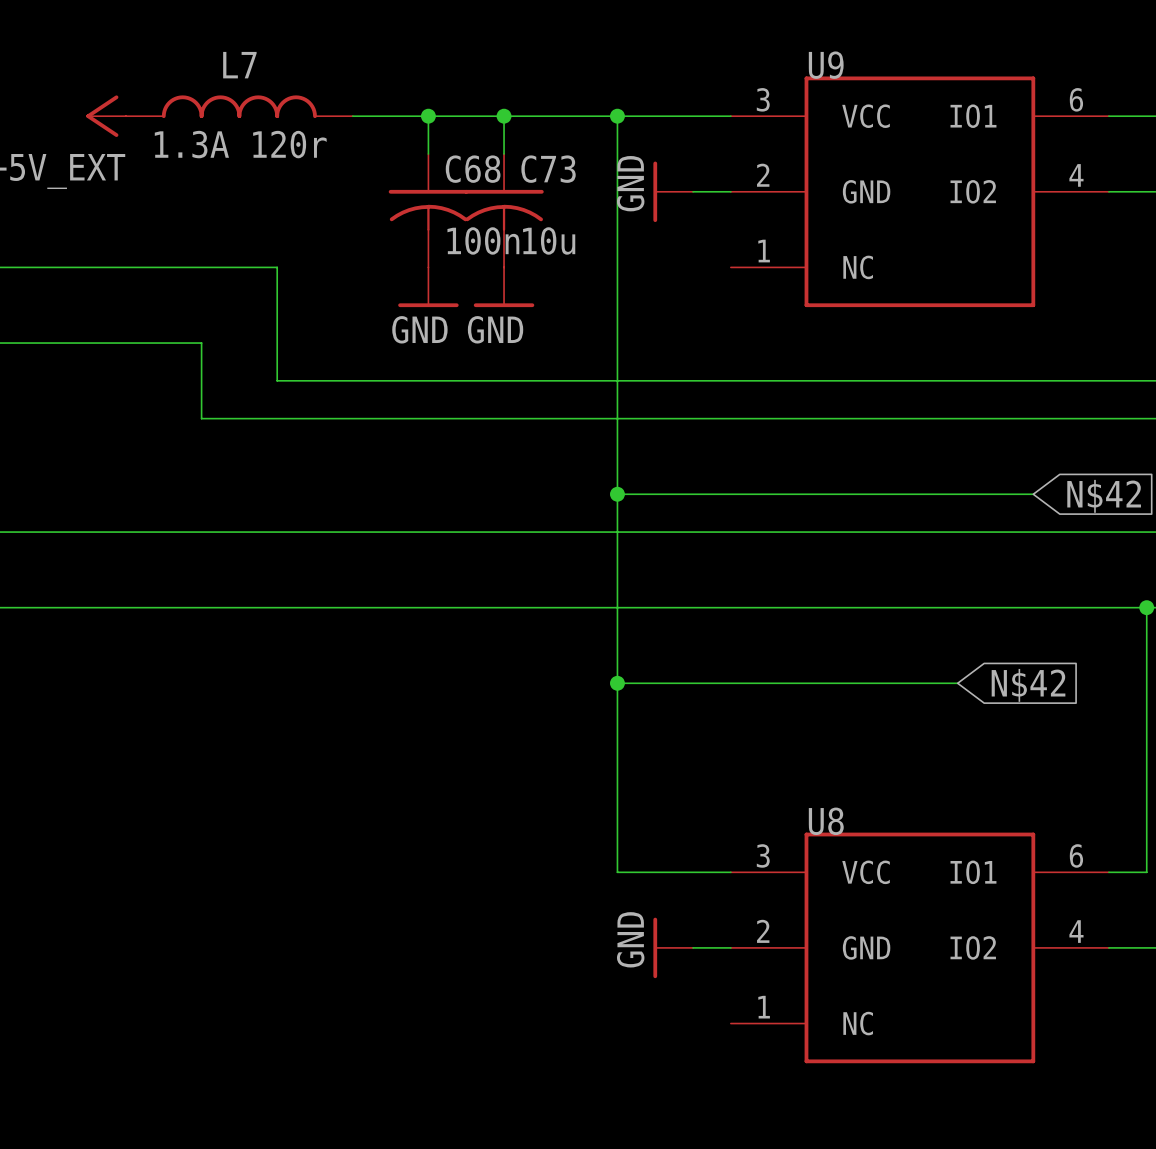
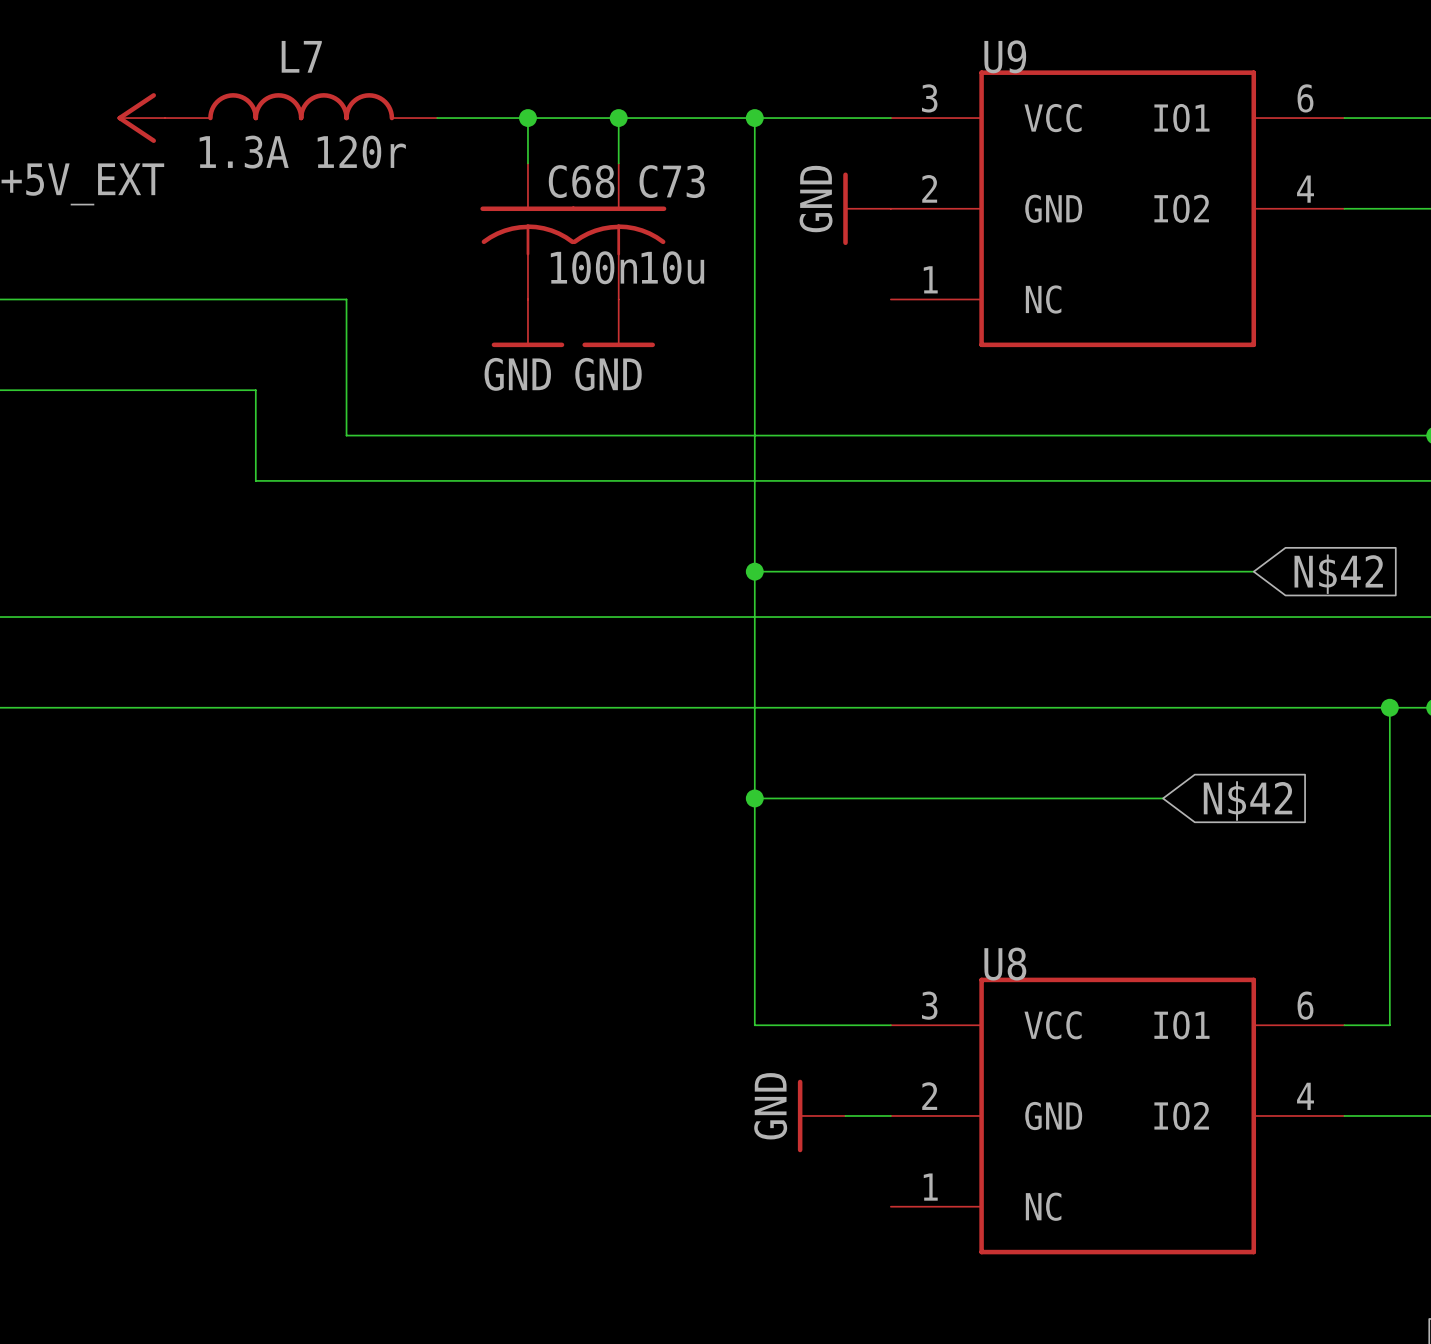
power symbol position: GND (673, 191) -> GND (867, 208)

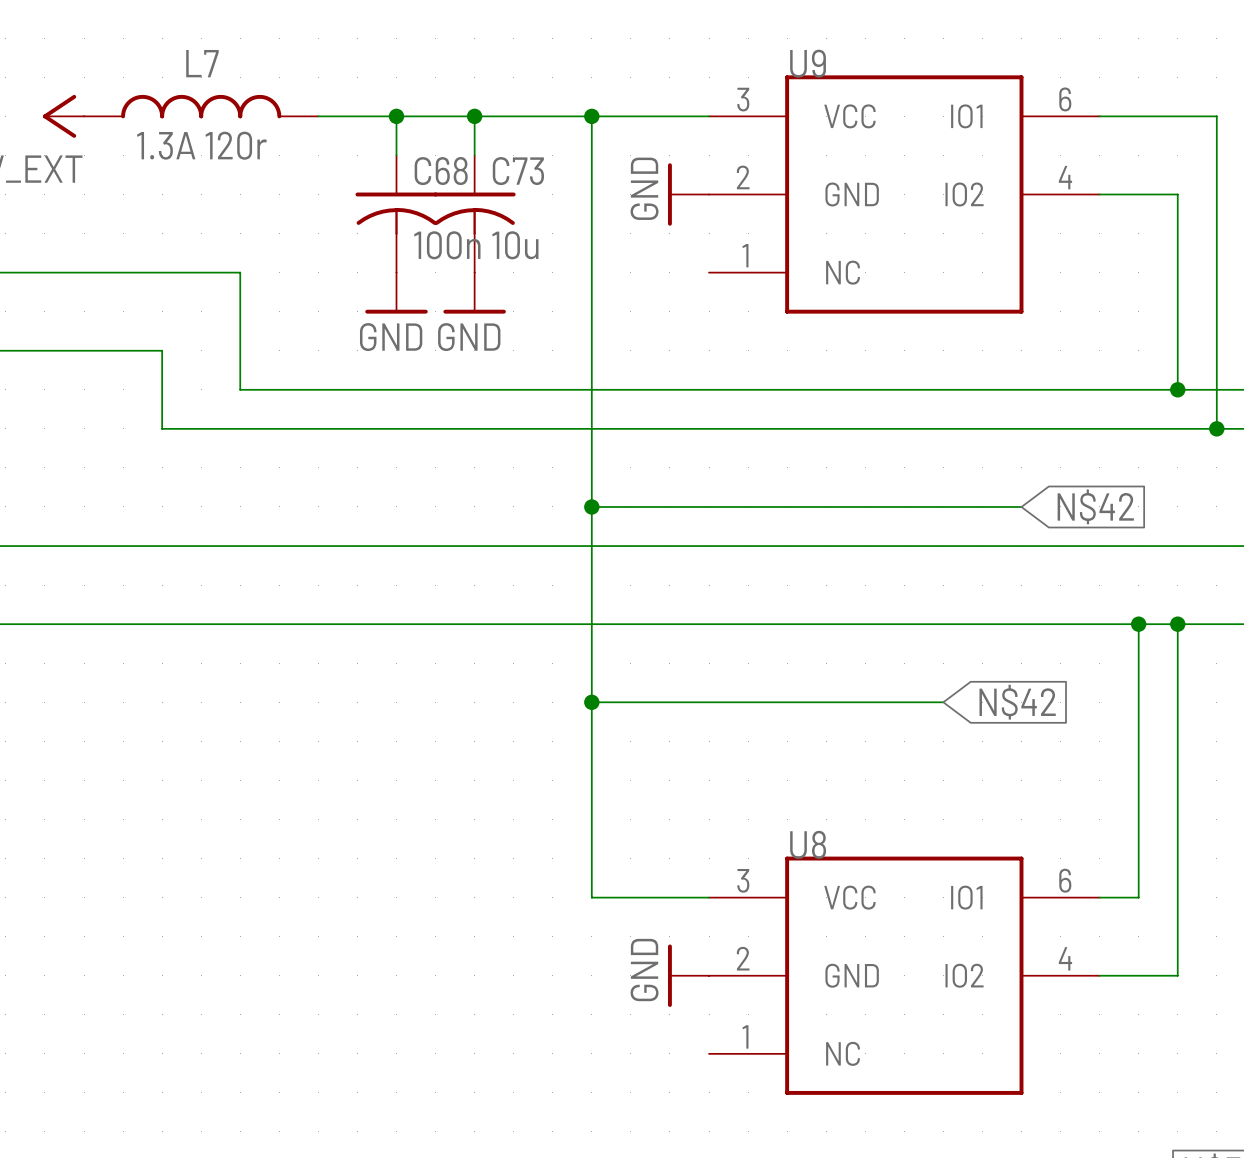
power symbol position: GND (821, 1115) -> GND (688, 975)

